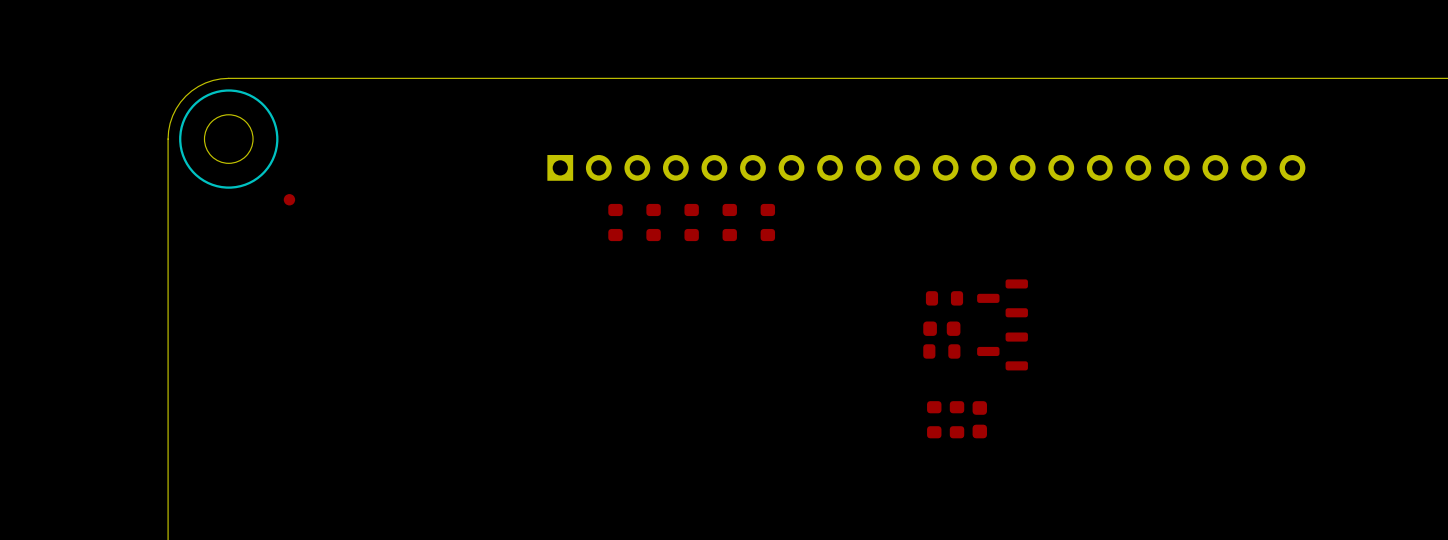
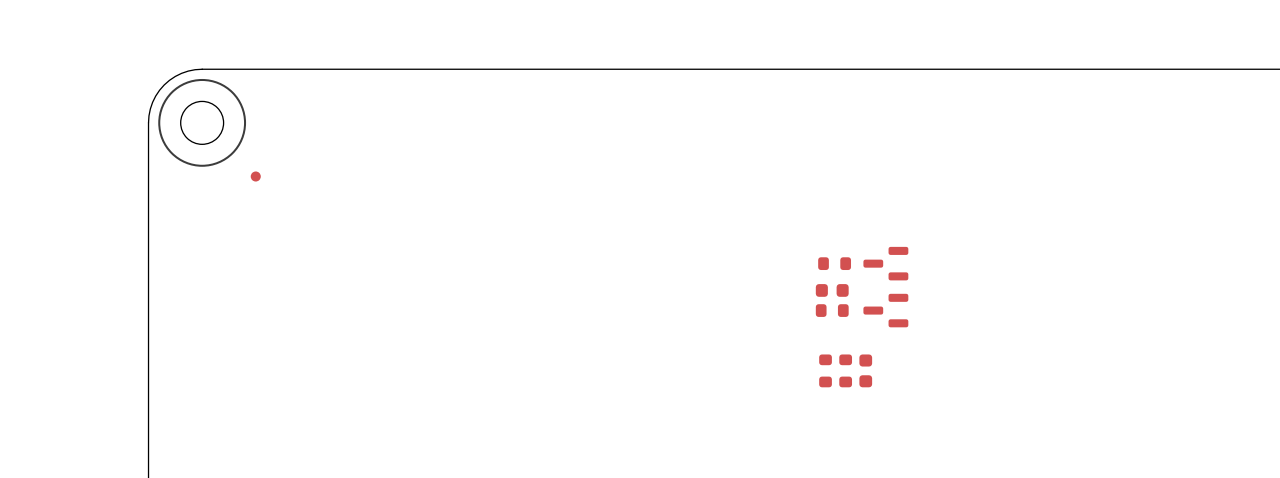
part: (926, 167) -> none
part: (615, 222) -> none
part: (653, 222) -> none
part: (691, 222) -> none
part: (729, 222) -> none
part: (767, 222) -> none

